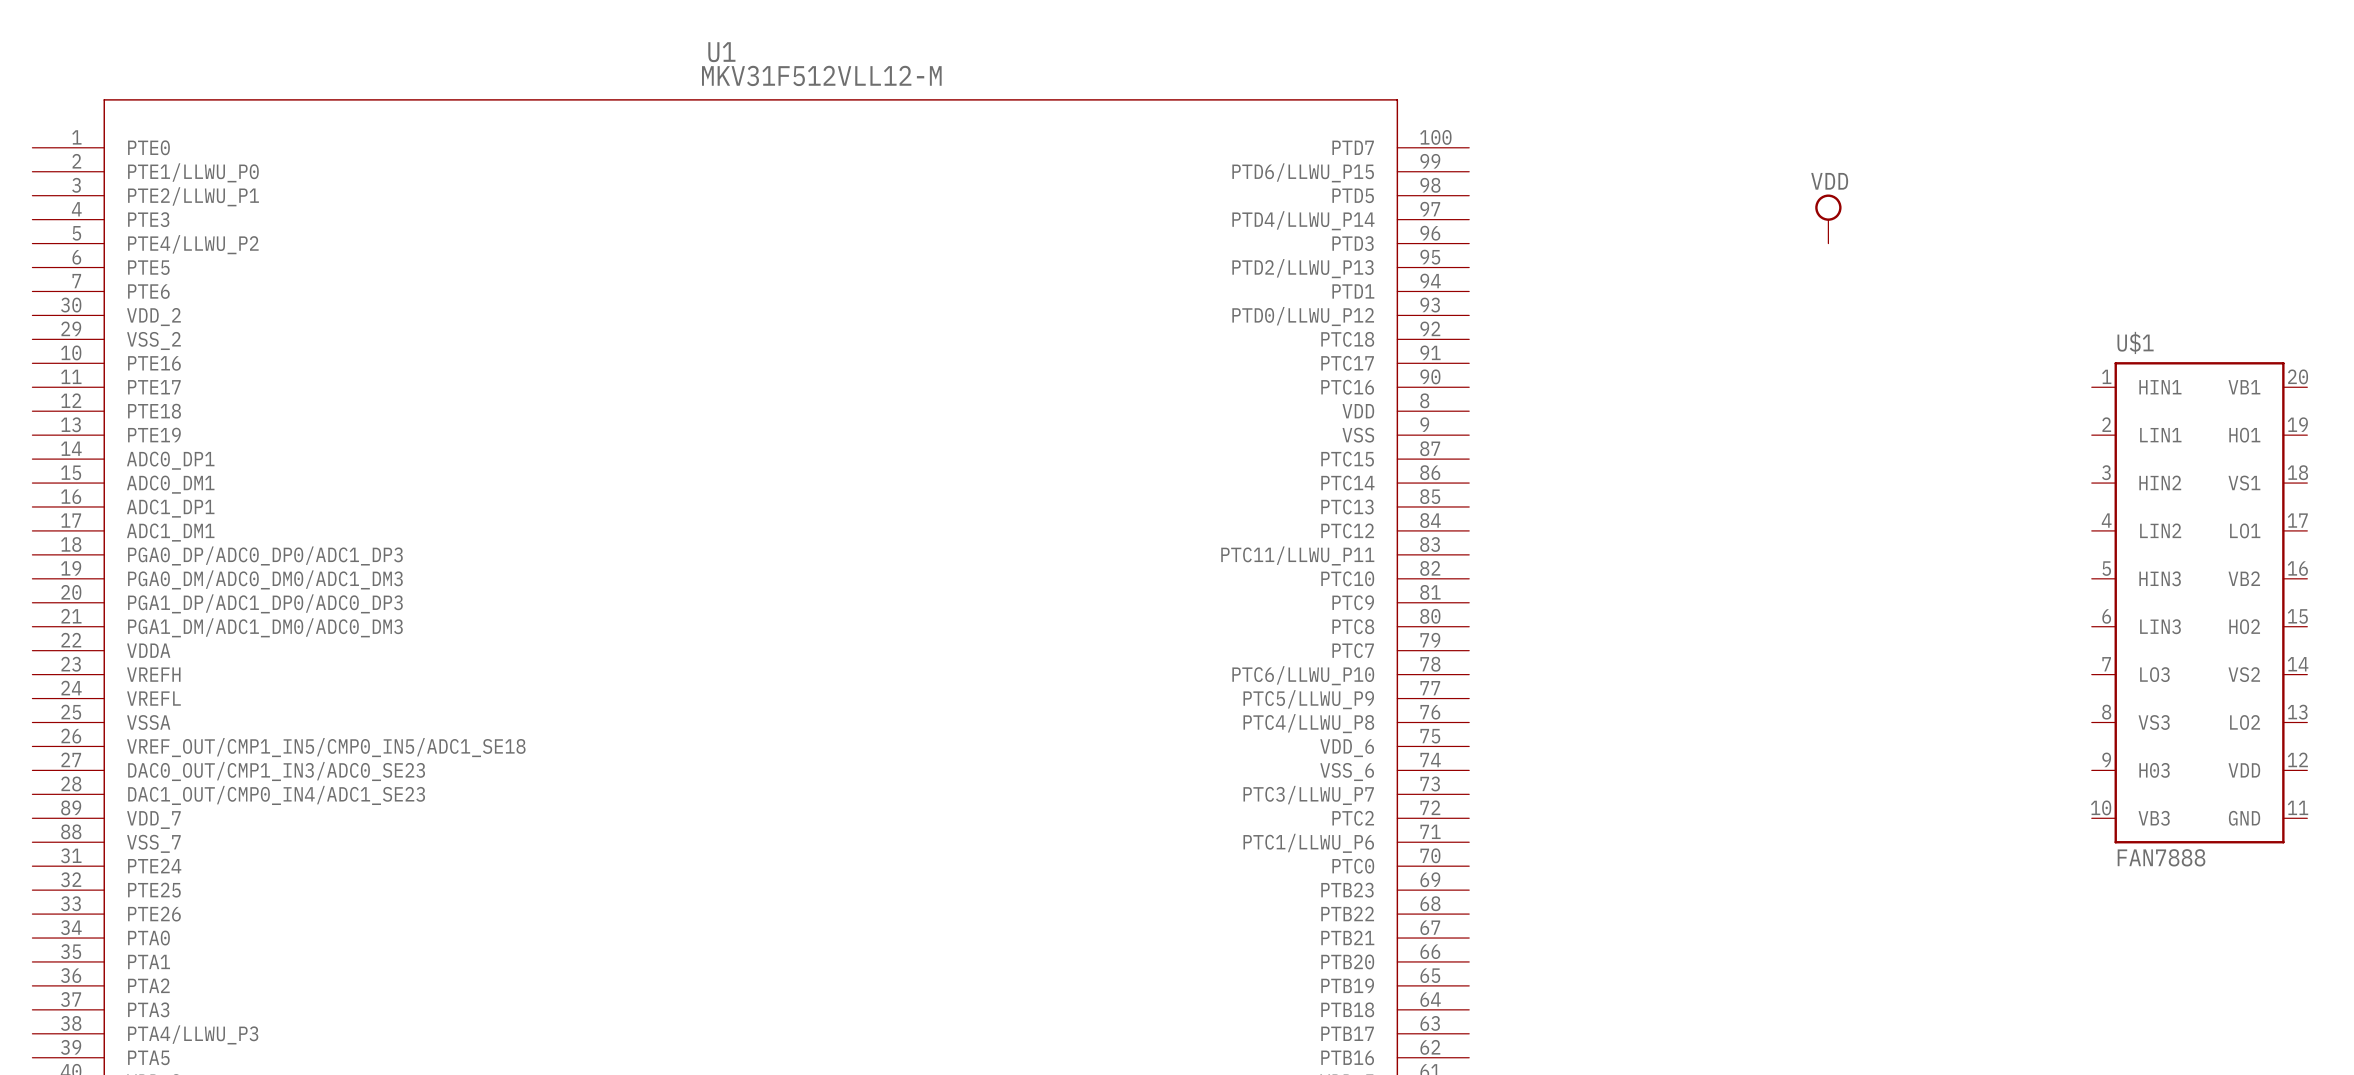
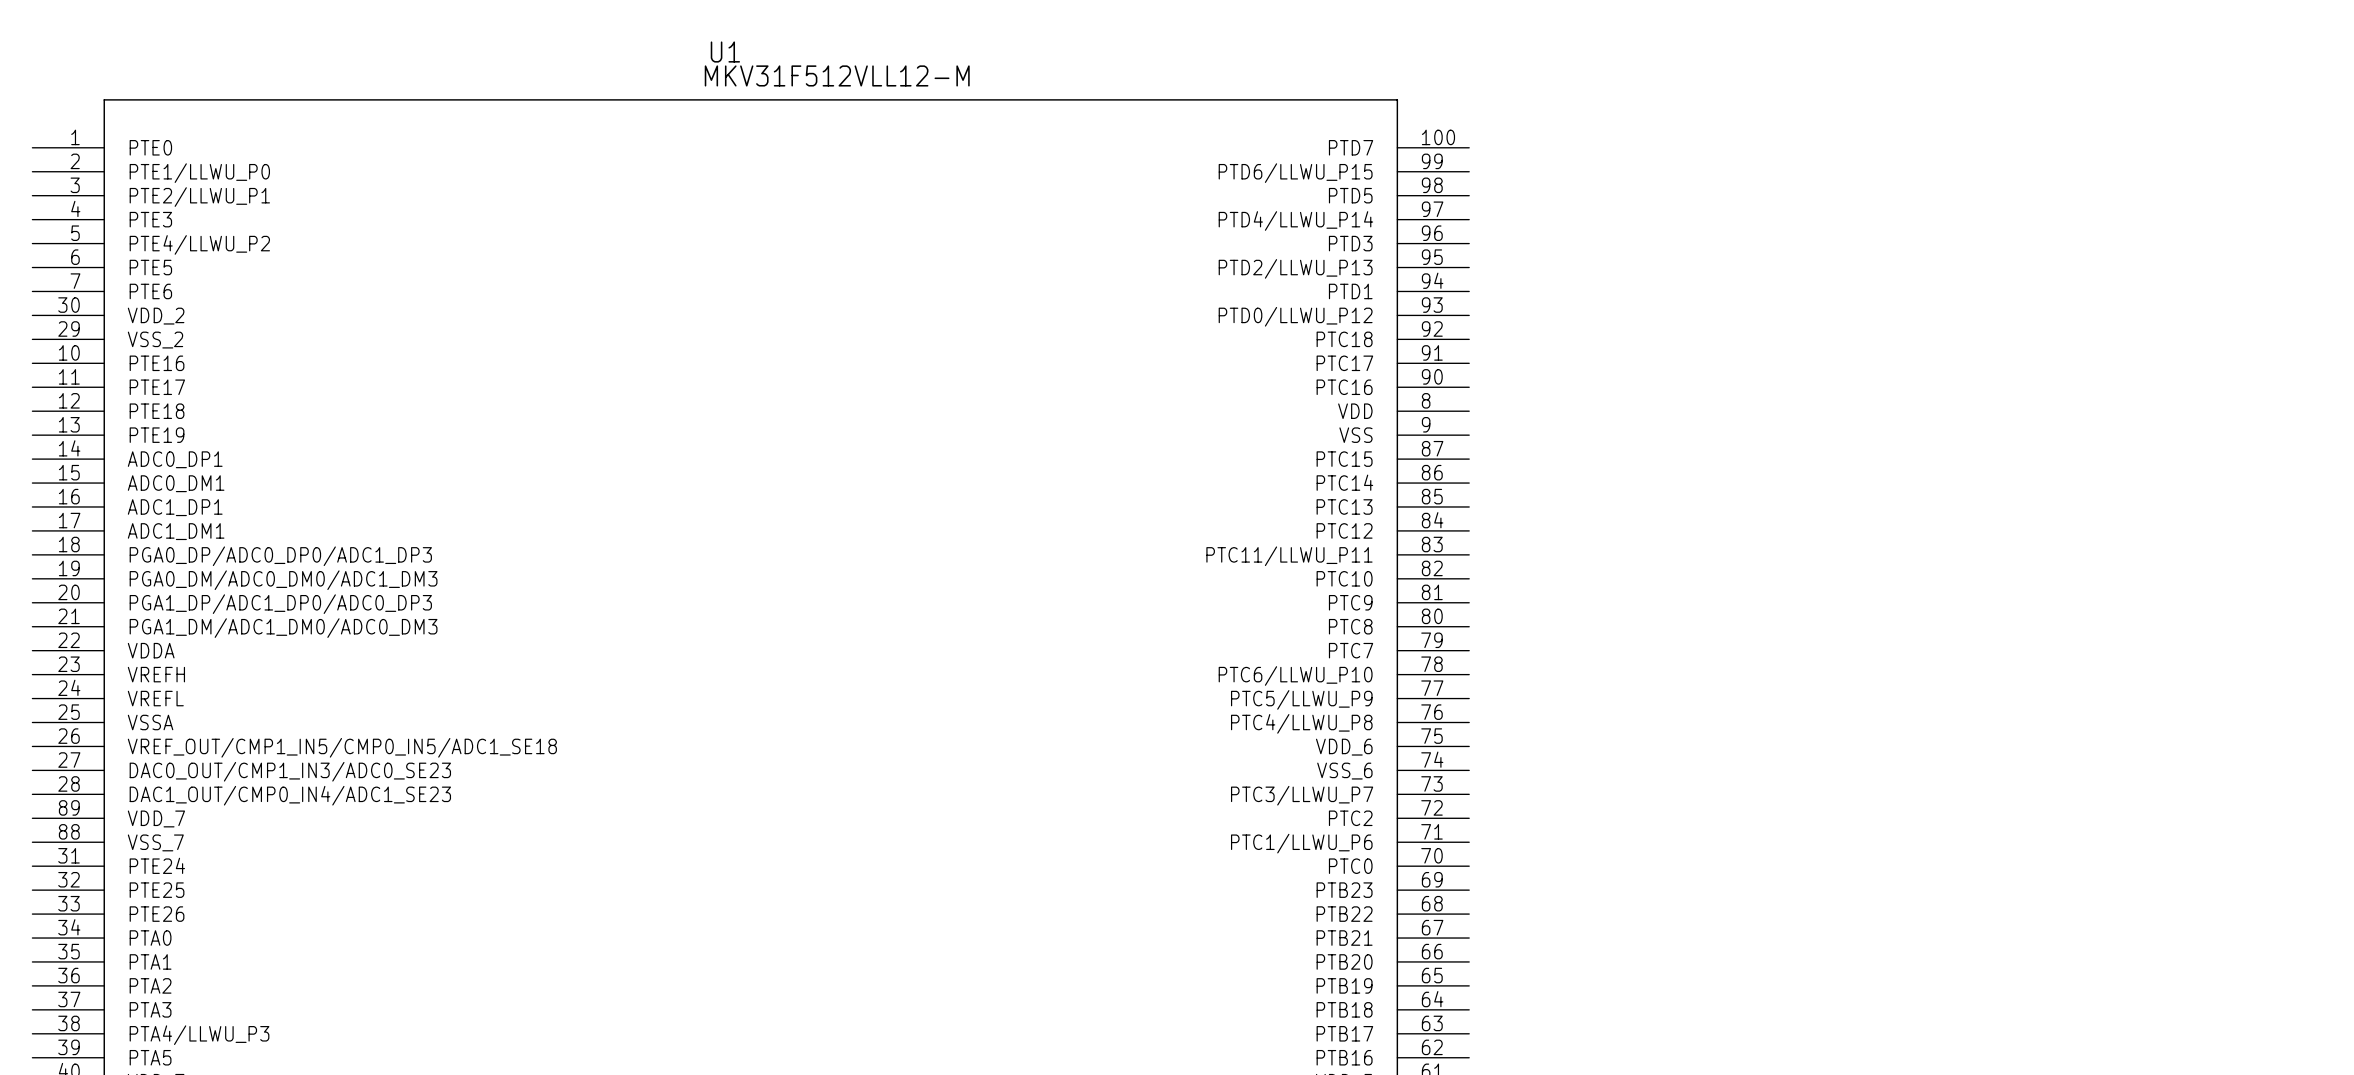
power symbol: VDD (1828, 219) -> none
U$1: FAN7888 (2199, 602) -> none

